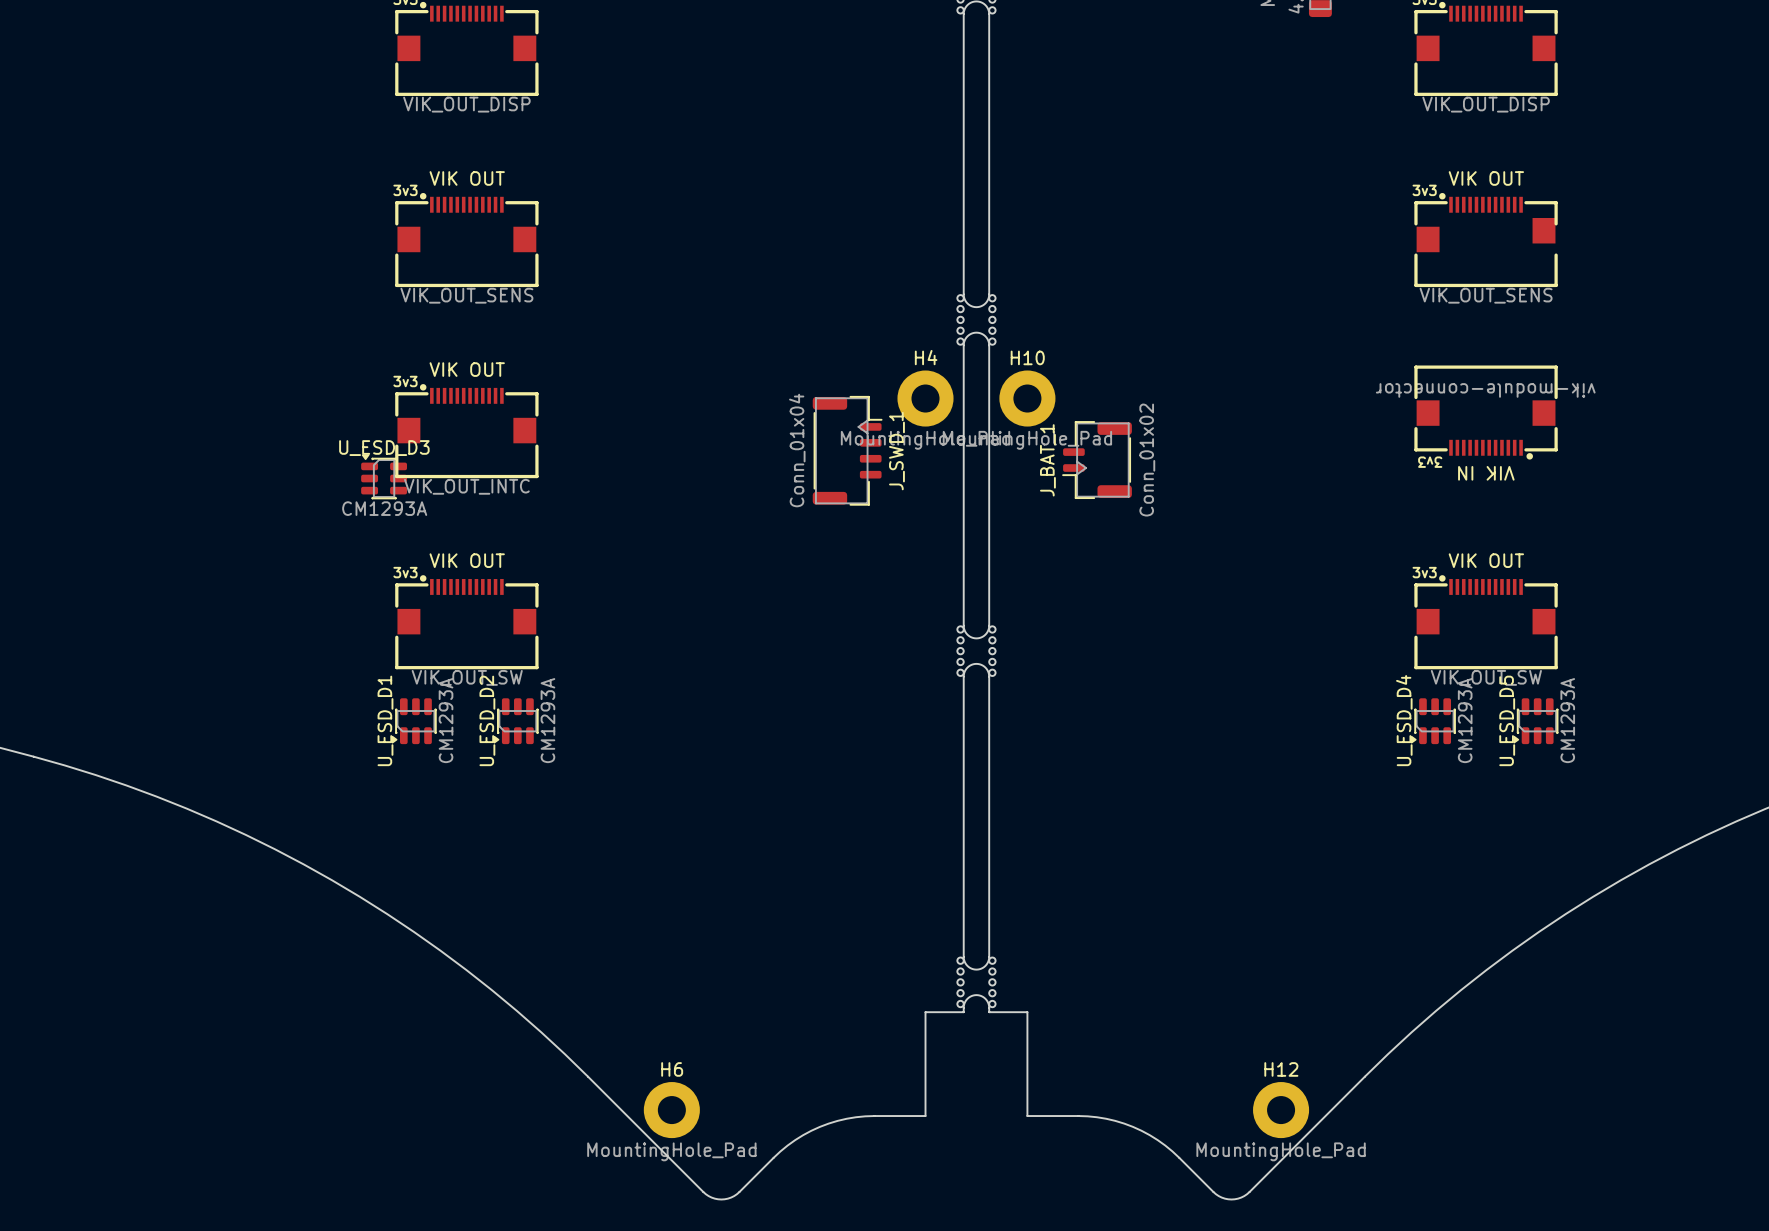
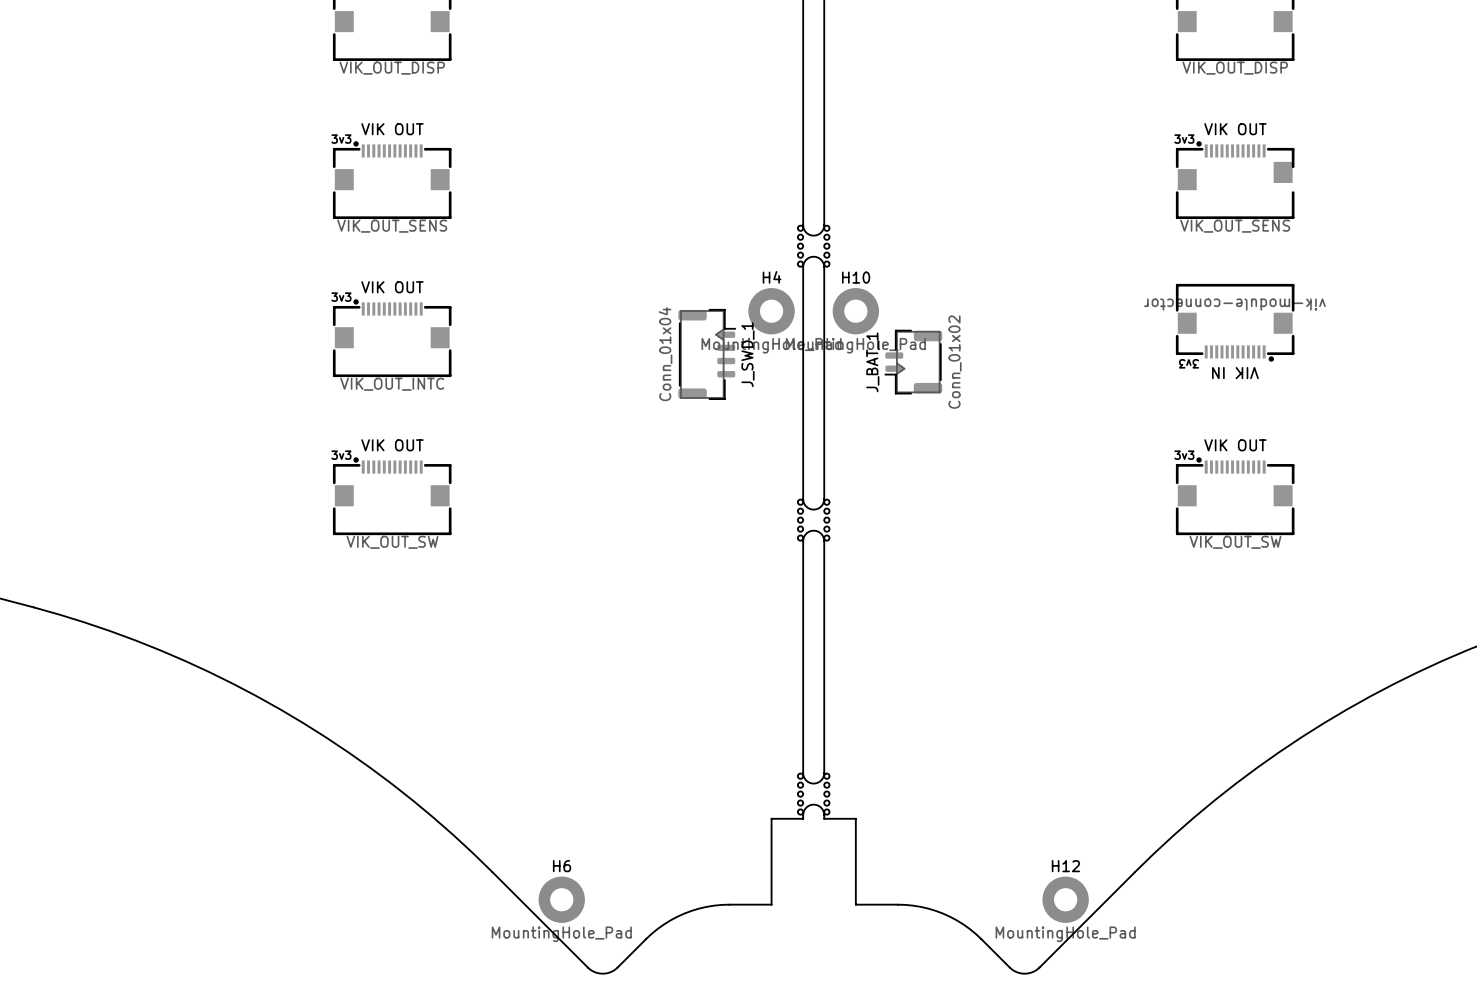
U_ESD_D3: CM1293A (384, 476) -> none
U_ESD_D1: CM1293A (414, 721) -> none
U_ESD_D2: CM1293A (516, 721) -> none
U_ESD_D4: CM1293A (1433, 721) -> none
U_ESD_D5: CM1293A (1535, 721) -> none

